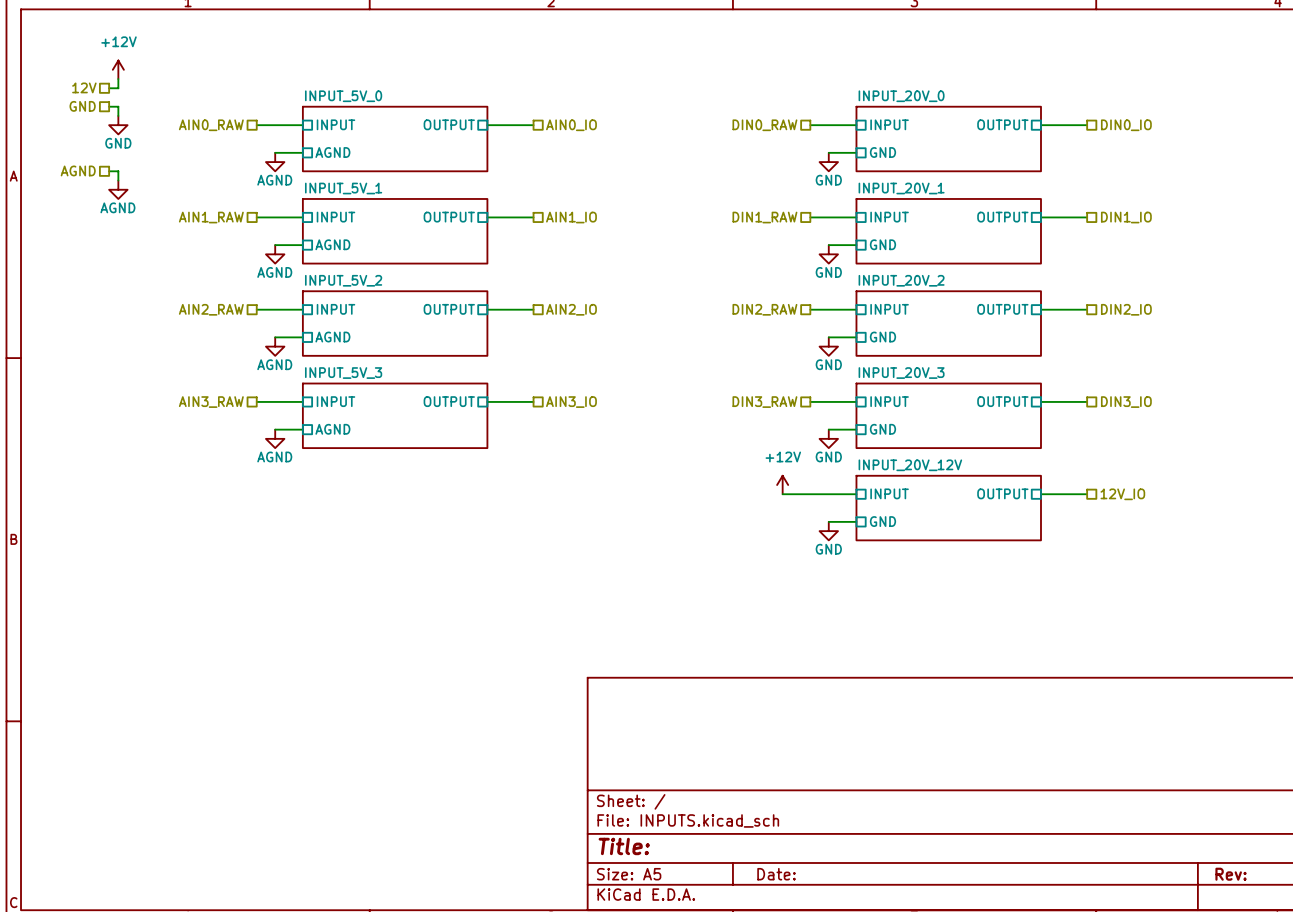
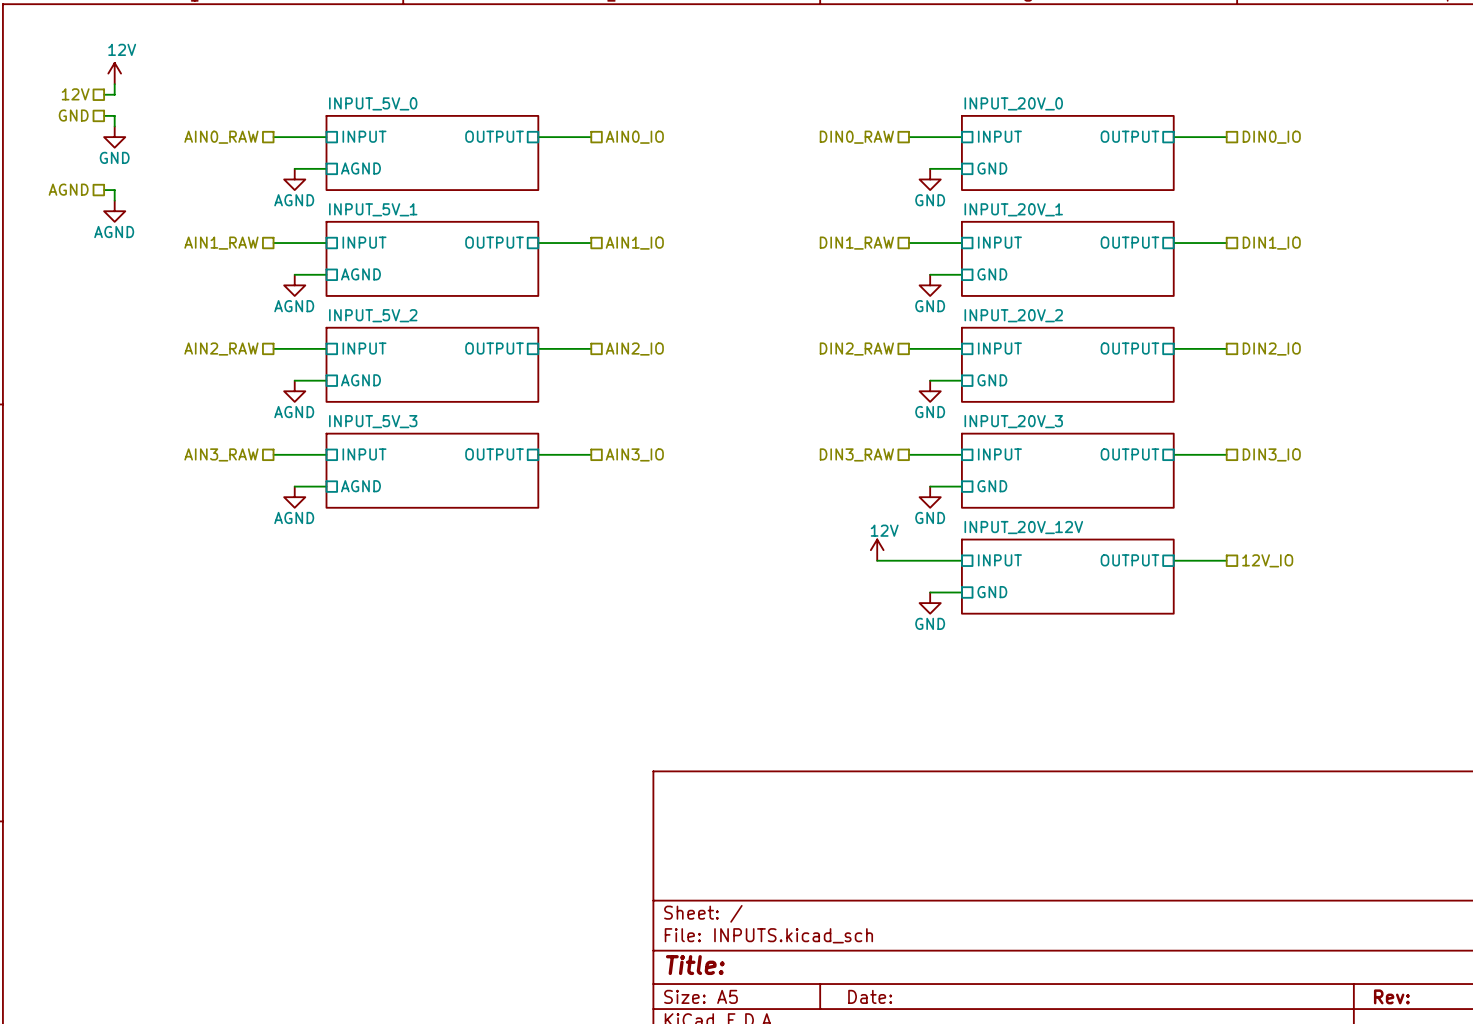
power symbol: +12V (118, 69) -> 12V (114, 73)
power symbol: +12V (782, 485) -> 12V (877, 550)

